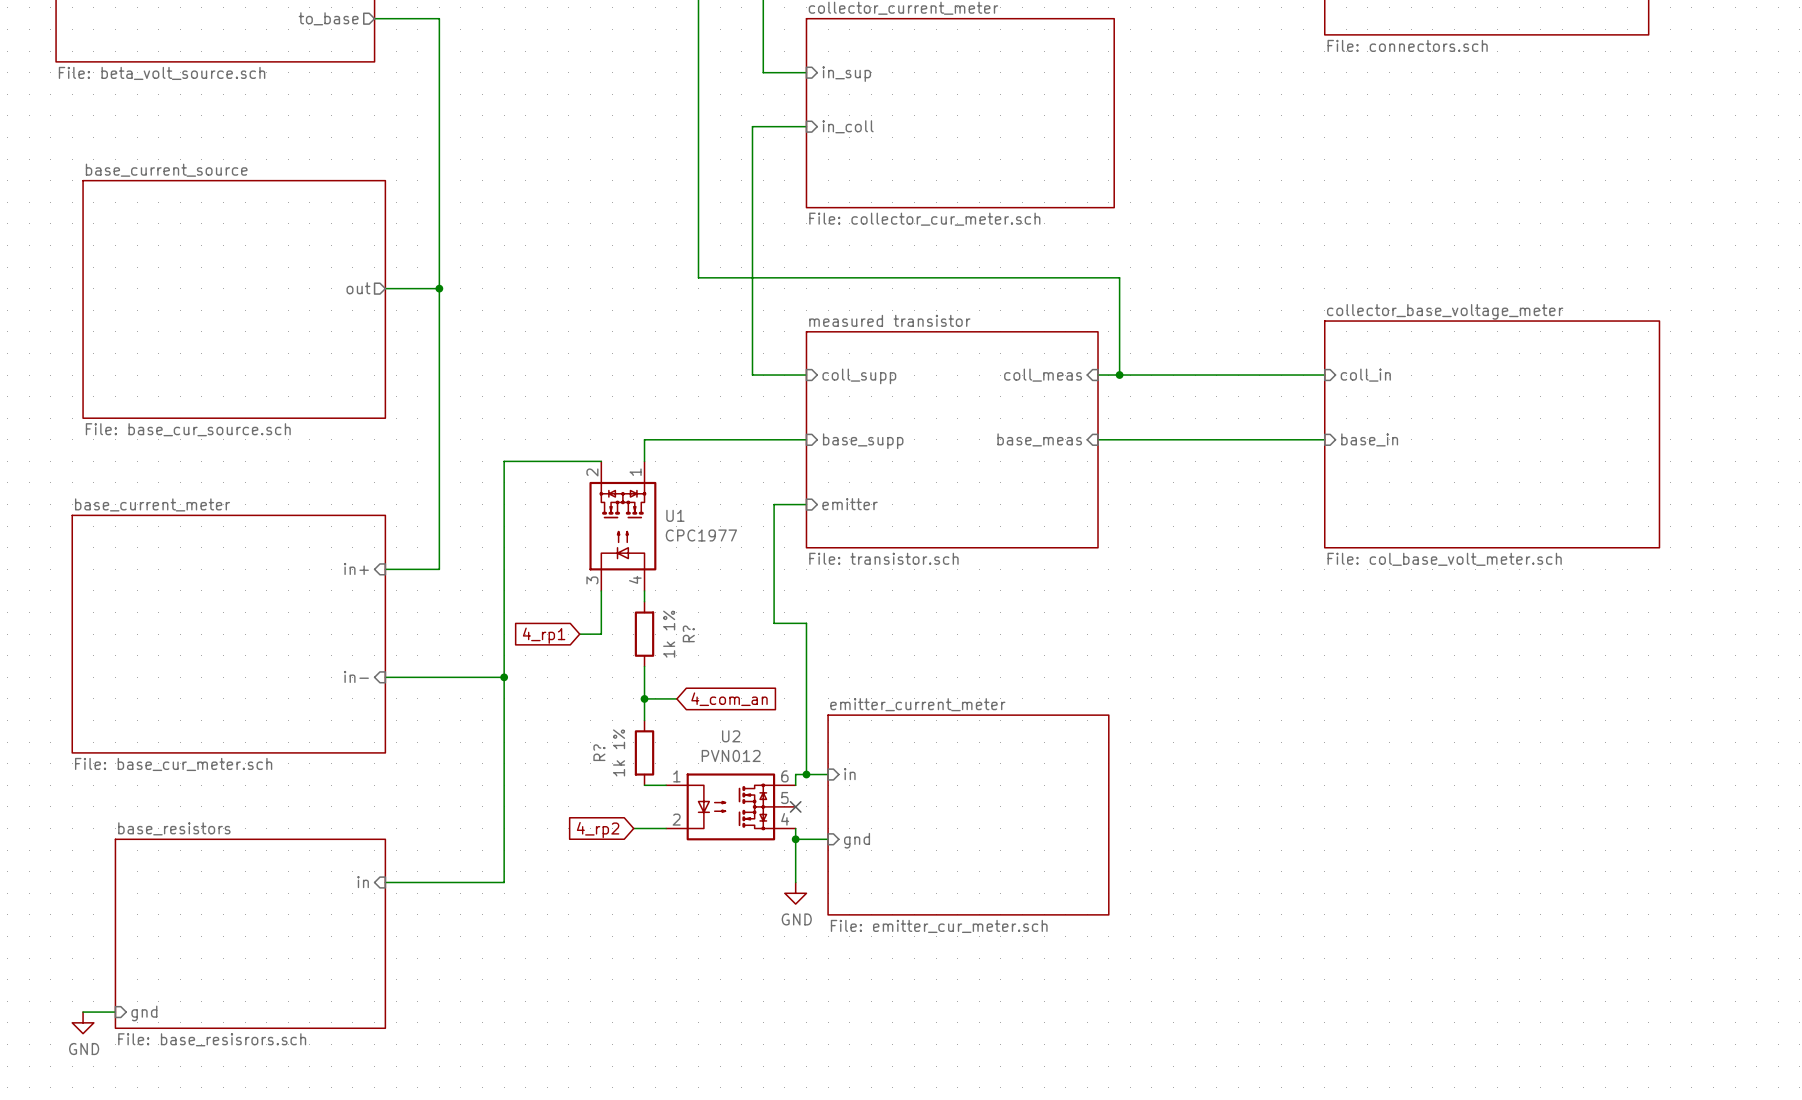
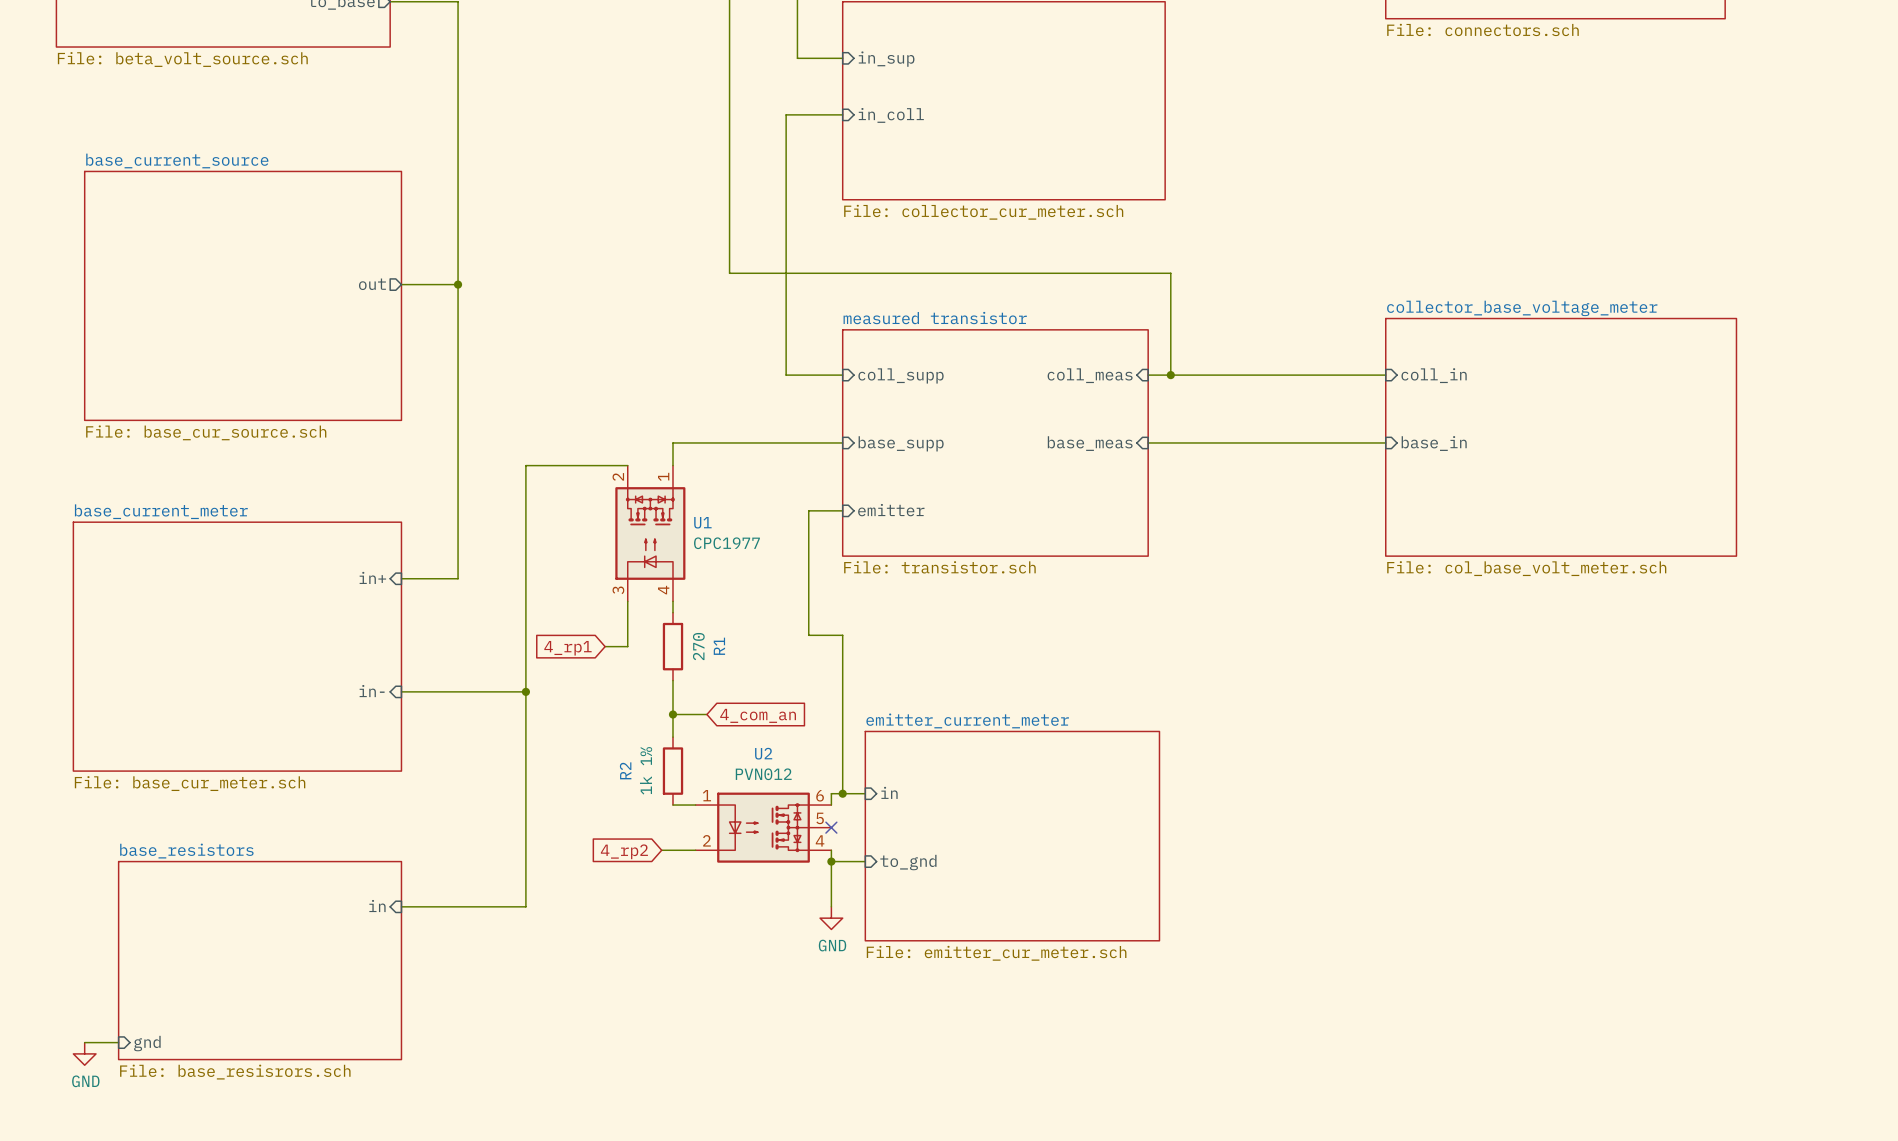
R? name: R? (688, 633) -> R1 (719, 646)
R? value: 1k 1% (669, 634) -> 270 (698, 646)
R? name: R? (599, 752) -> R2 (625, 770)
sheet pin: gnd (857, 840) -> to_gnd (908, 862)

